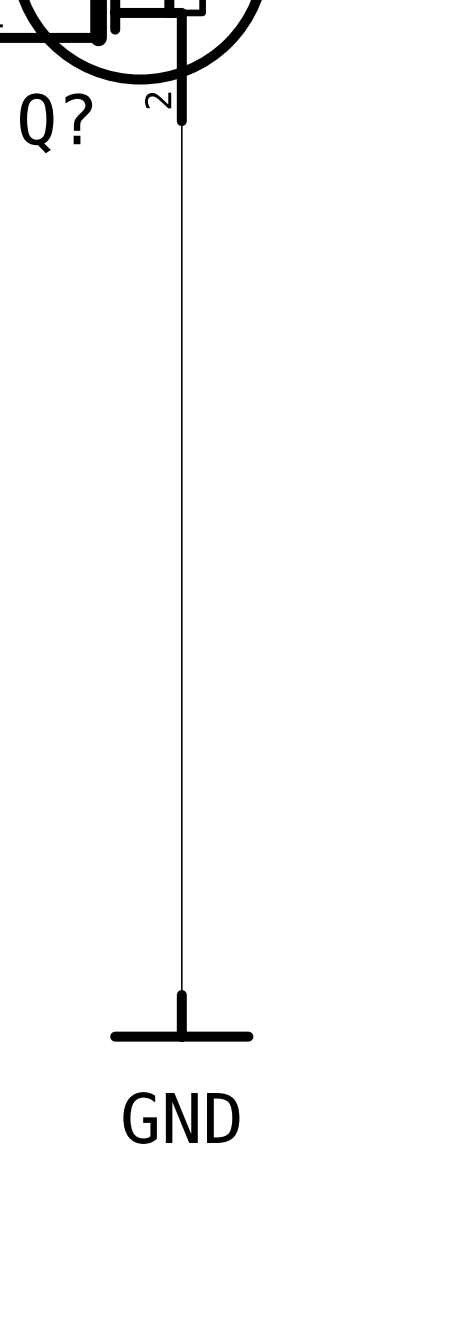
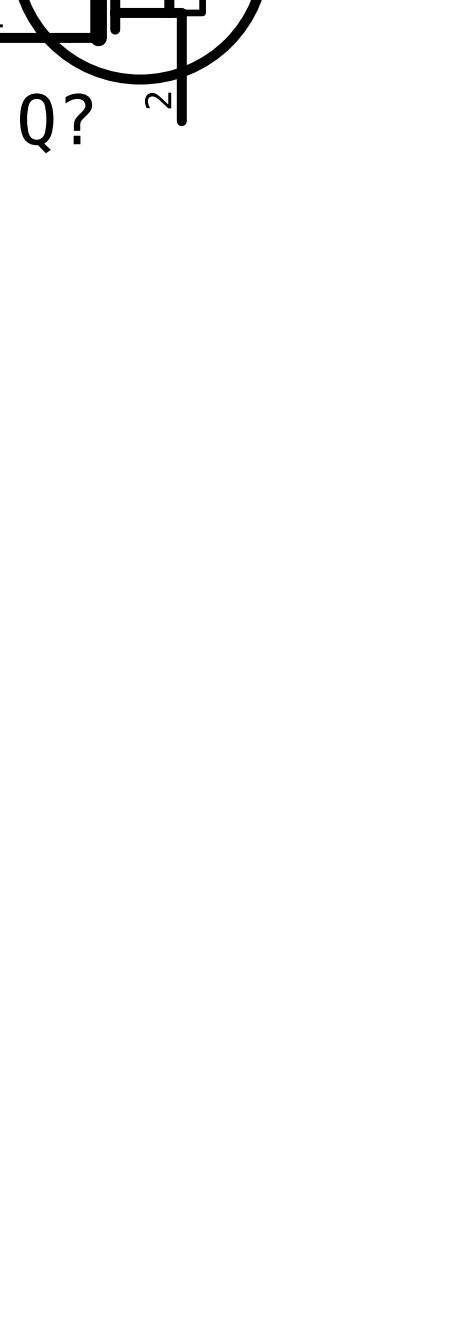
wire: (181, 121) (181, 995) -> none
power symbol: GND (181, 1015) -> none

